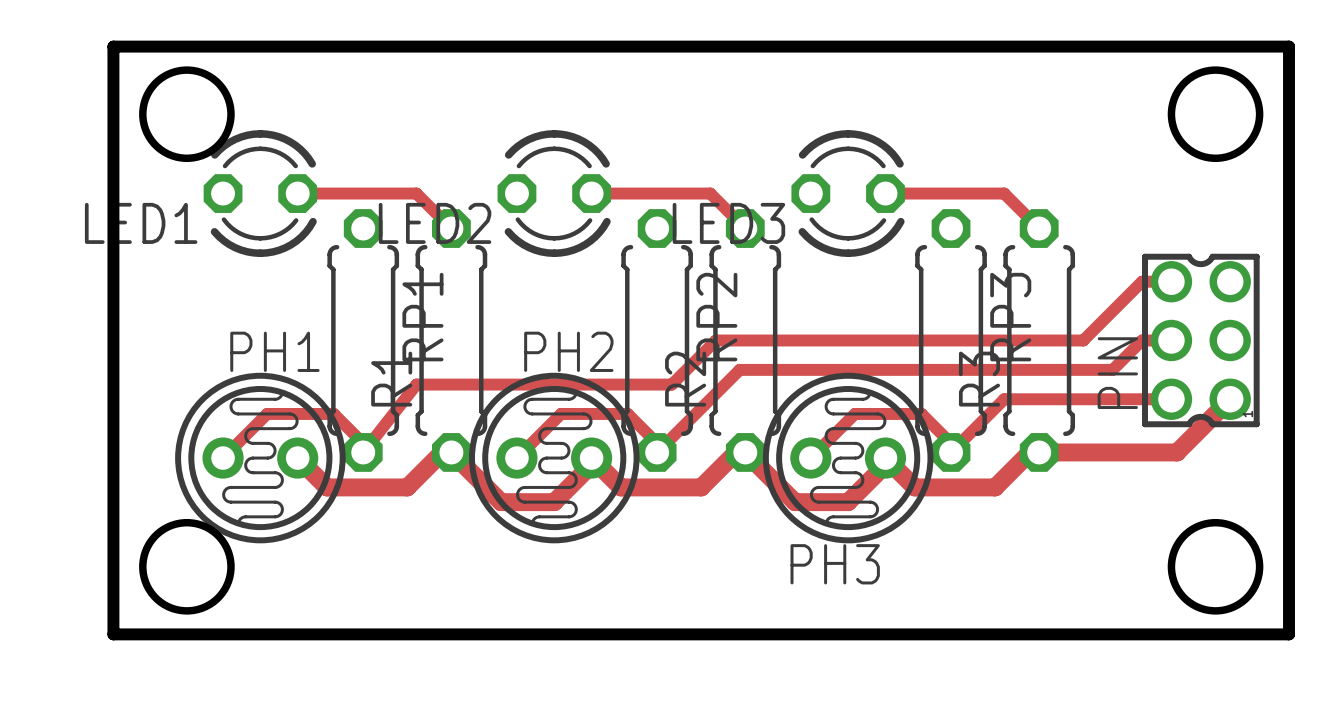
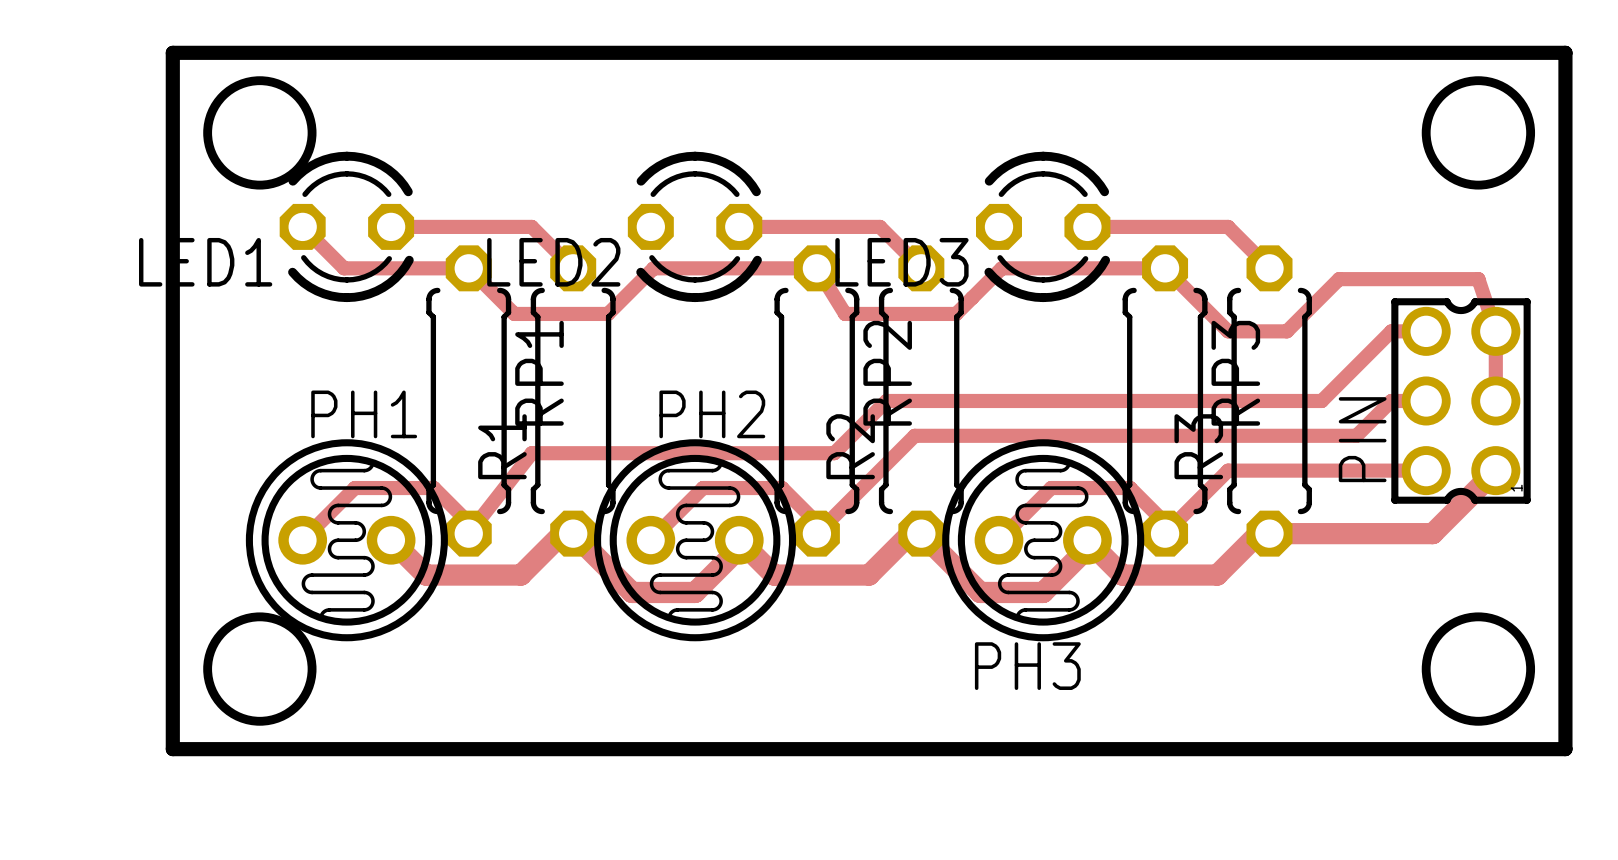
top track: none -> (302, 226) (344, 268) (468, 268) (514, 313) (608, 313) (653, 268) (816, 268) (845, 313) (956, 313) (1001, 268) (1165, 268) (1228, 331) (1286, 331) (1339, 279) (1478, 279) (1495, 331) (1495, 400)

